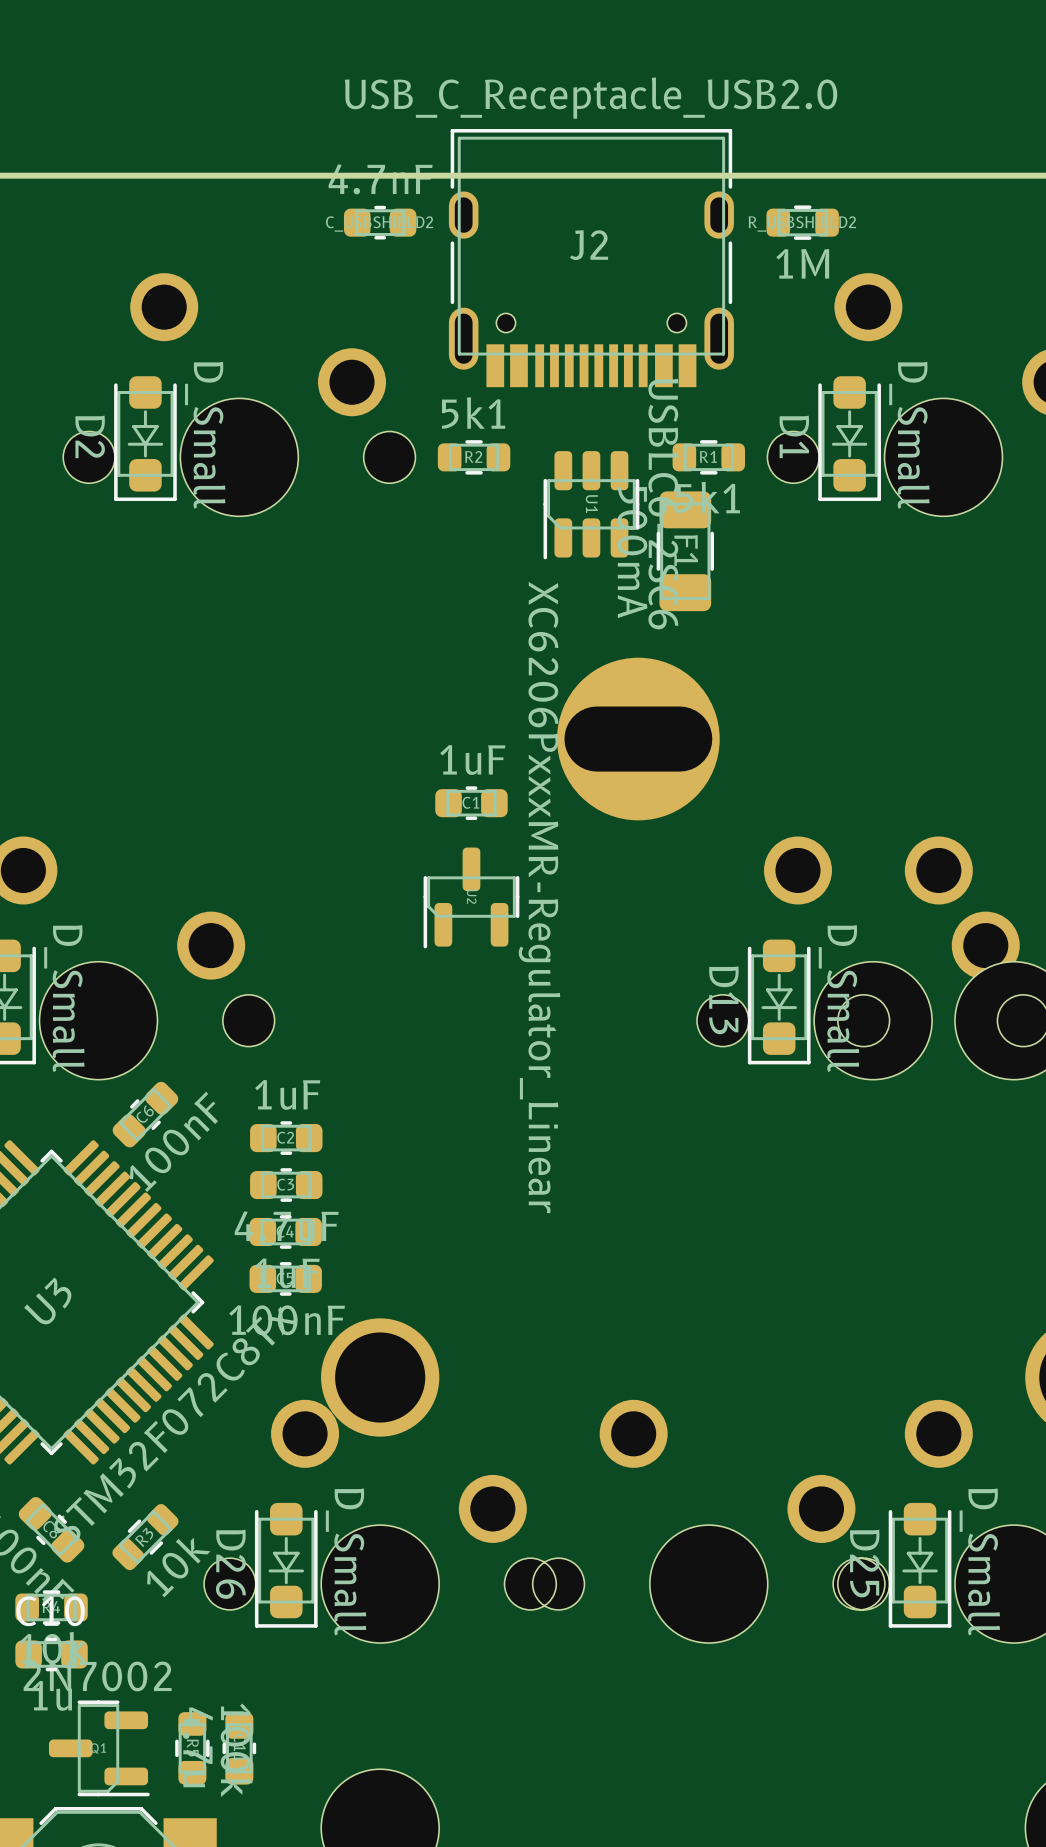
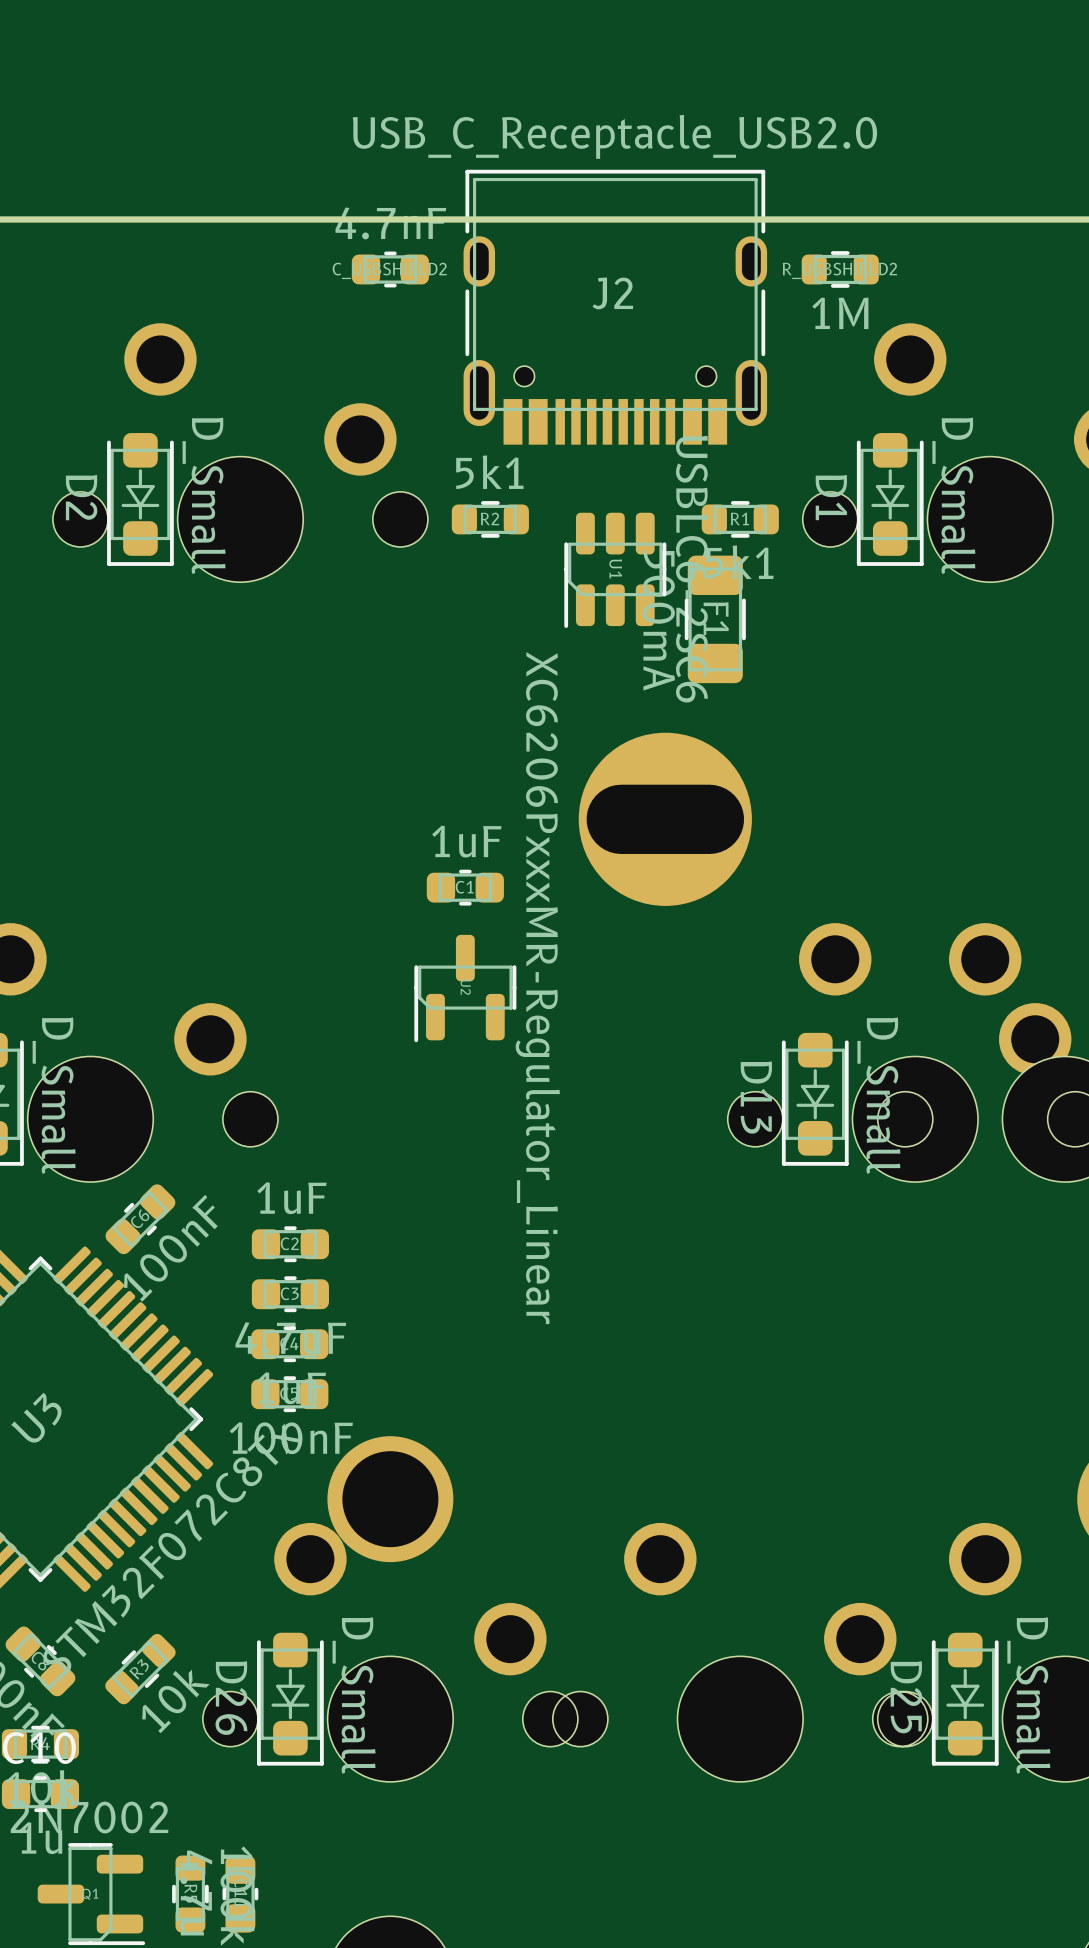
C1 position: (471, 803) -> (465, 887)
U2 position: (471, 897) -> (465, 988)

